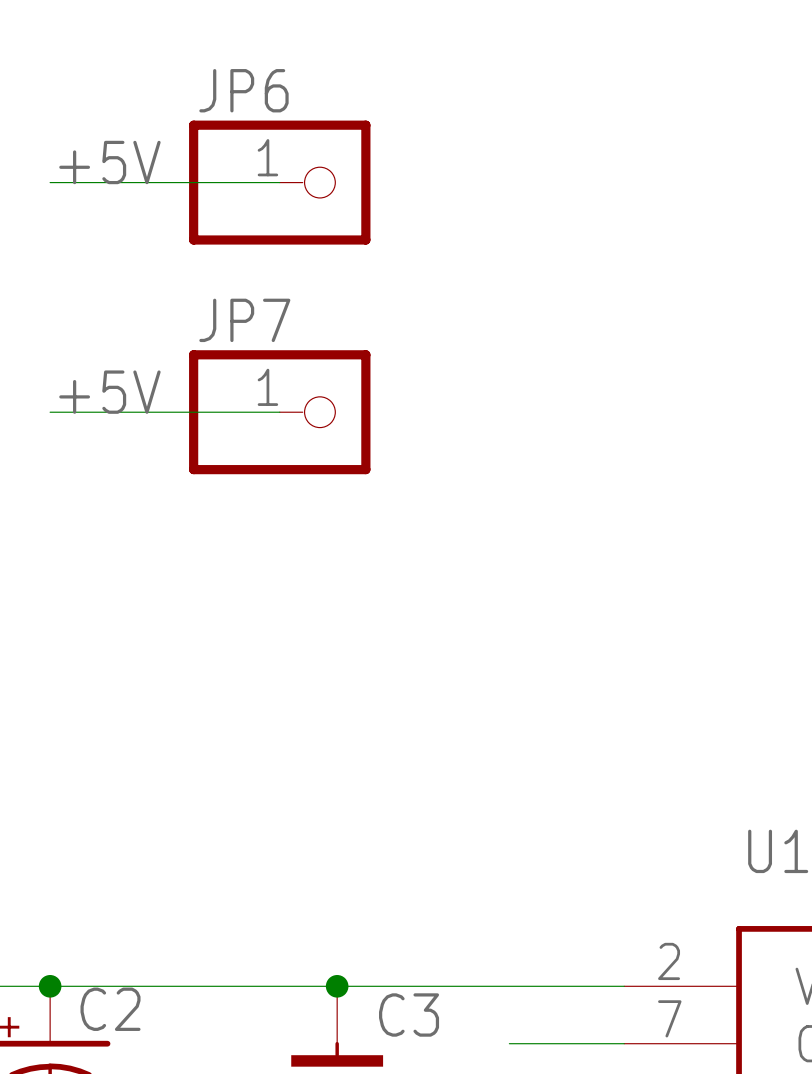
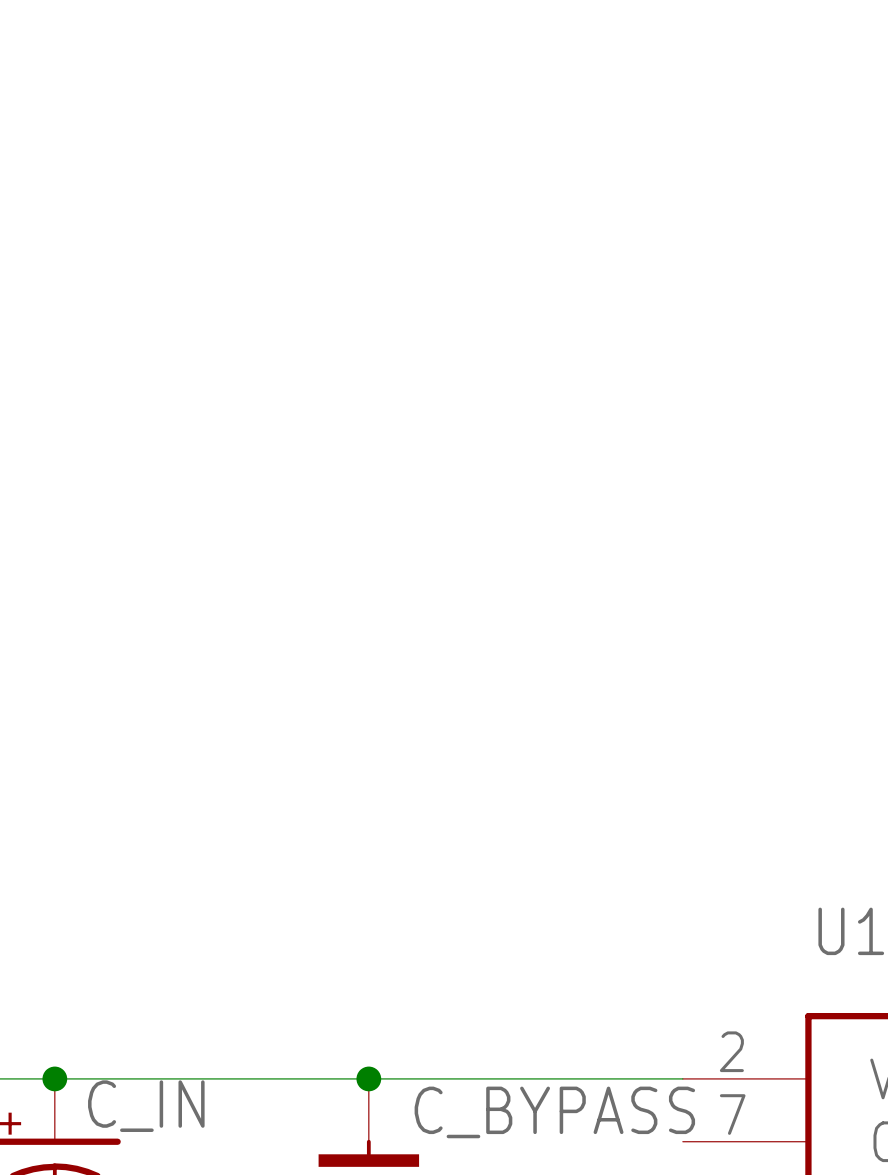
label: +5V (109, 162) -> none
wire: (50, 182) (279, 182) -> none
JP6: (279, 182) -> none
label: +5V (109, 392) -> none
wire: (50, 412) (279, 412) -> none
JP7: (279, 412) -> none
C2 name: C2 (110, 1009) -> C_IN (146, 1106)
C3 name: C3 (409, 1015) -> C_BYPASS (554, 1112)
wire: (509, 1043) (624, 1043) -> none

